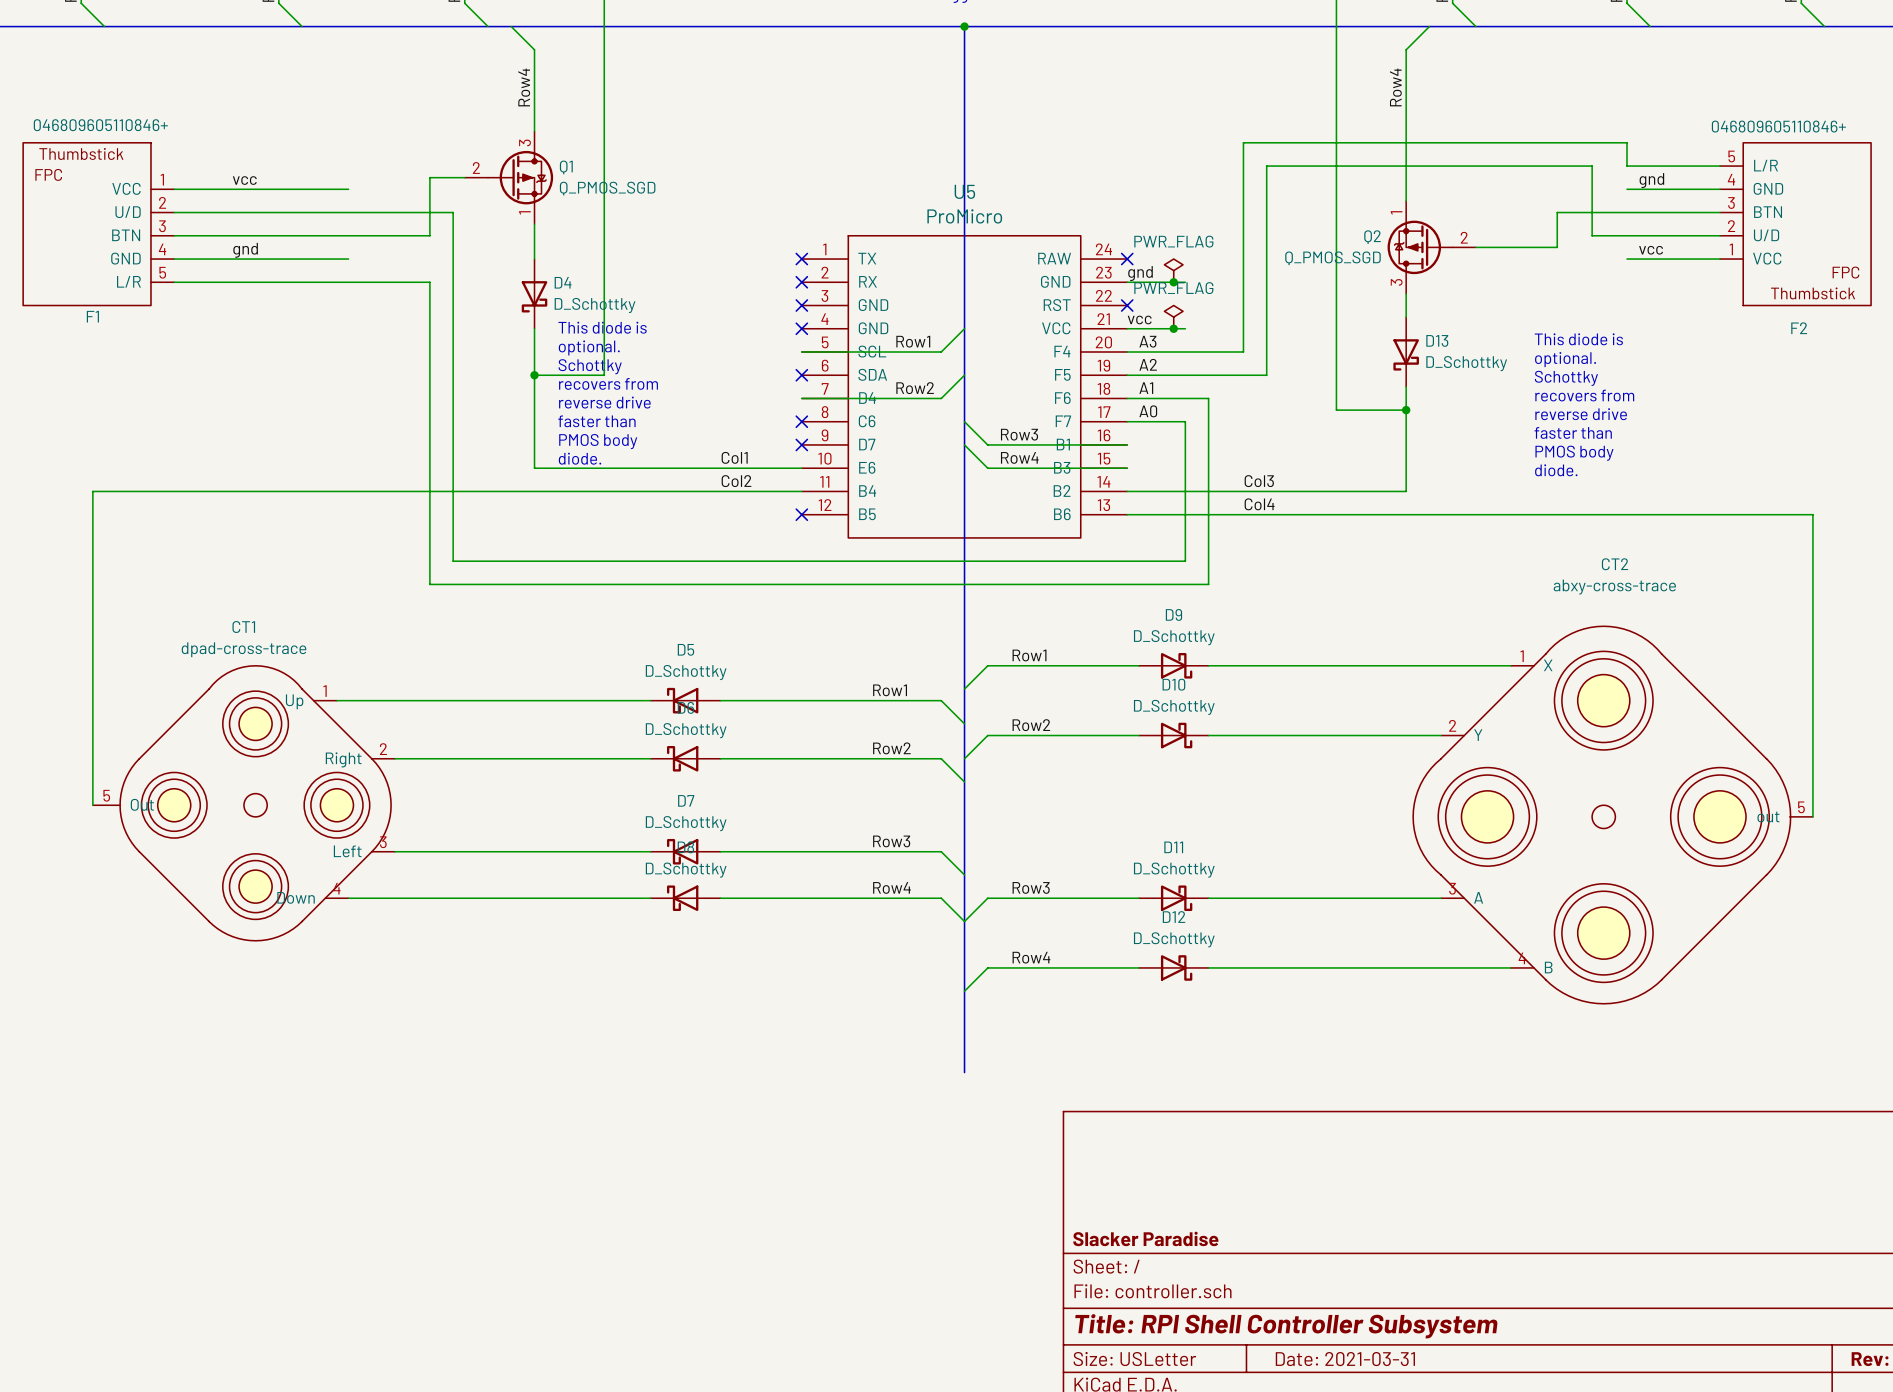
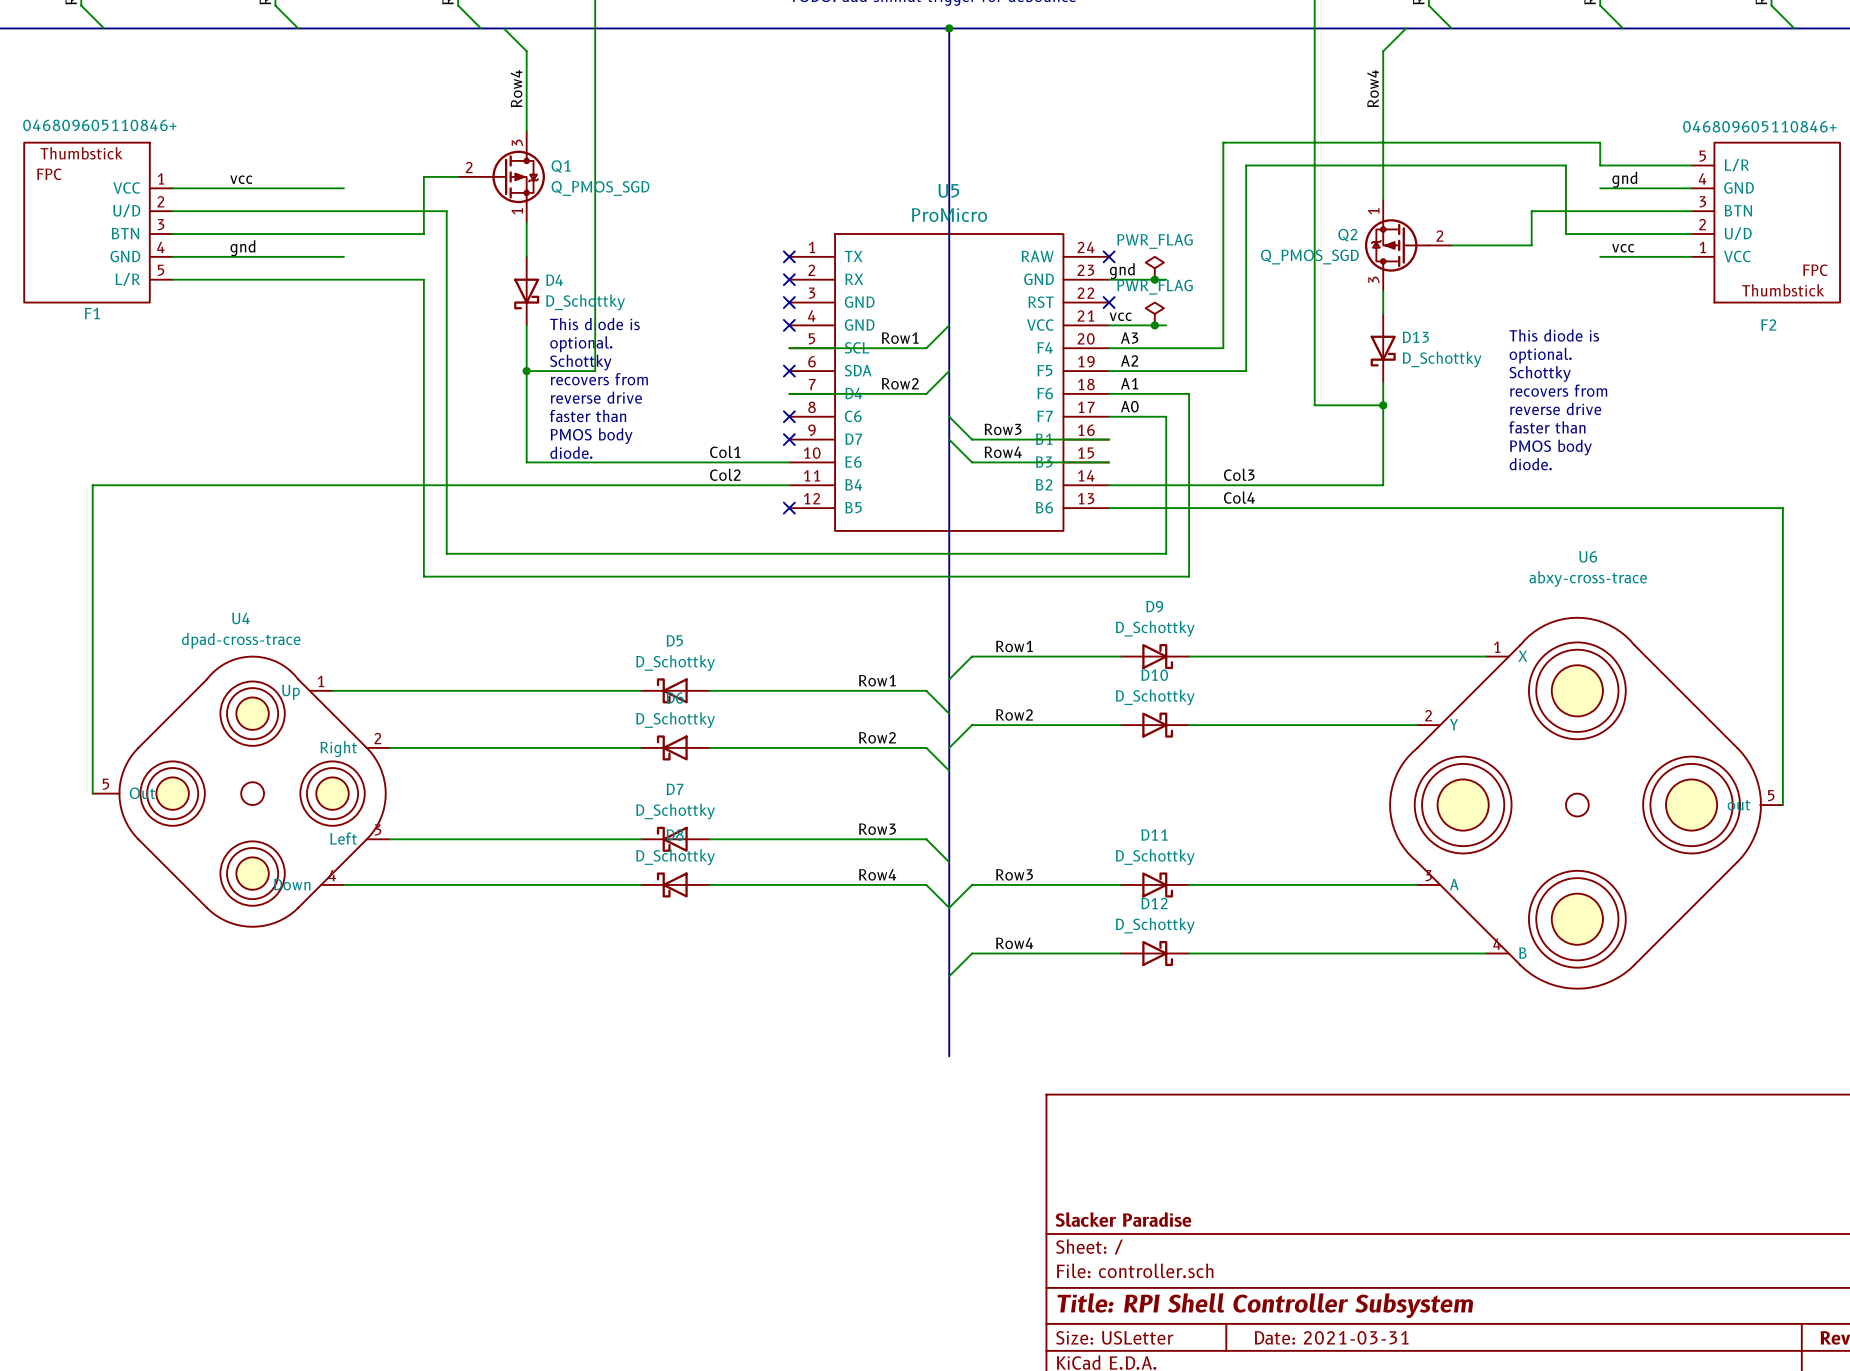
CT2 name: CT2 (1615, 564) -> U6 (1588, 556)
CT1 name: CT1 (243, 627) -> U4 (240, 618)

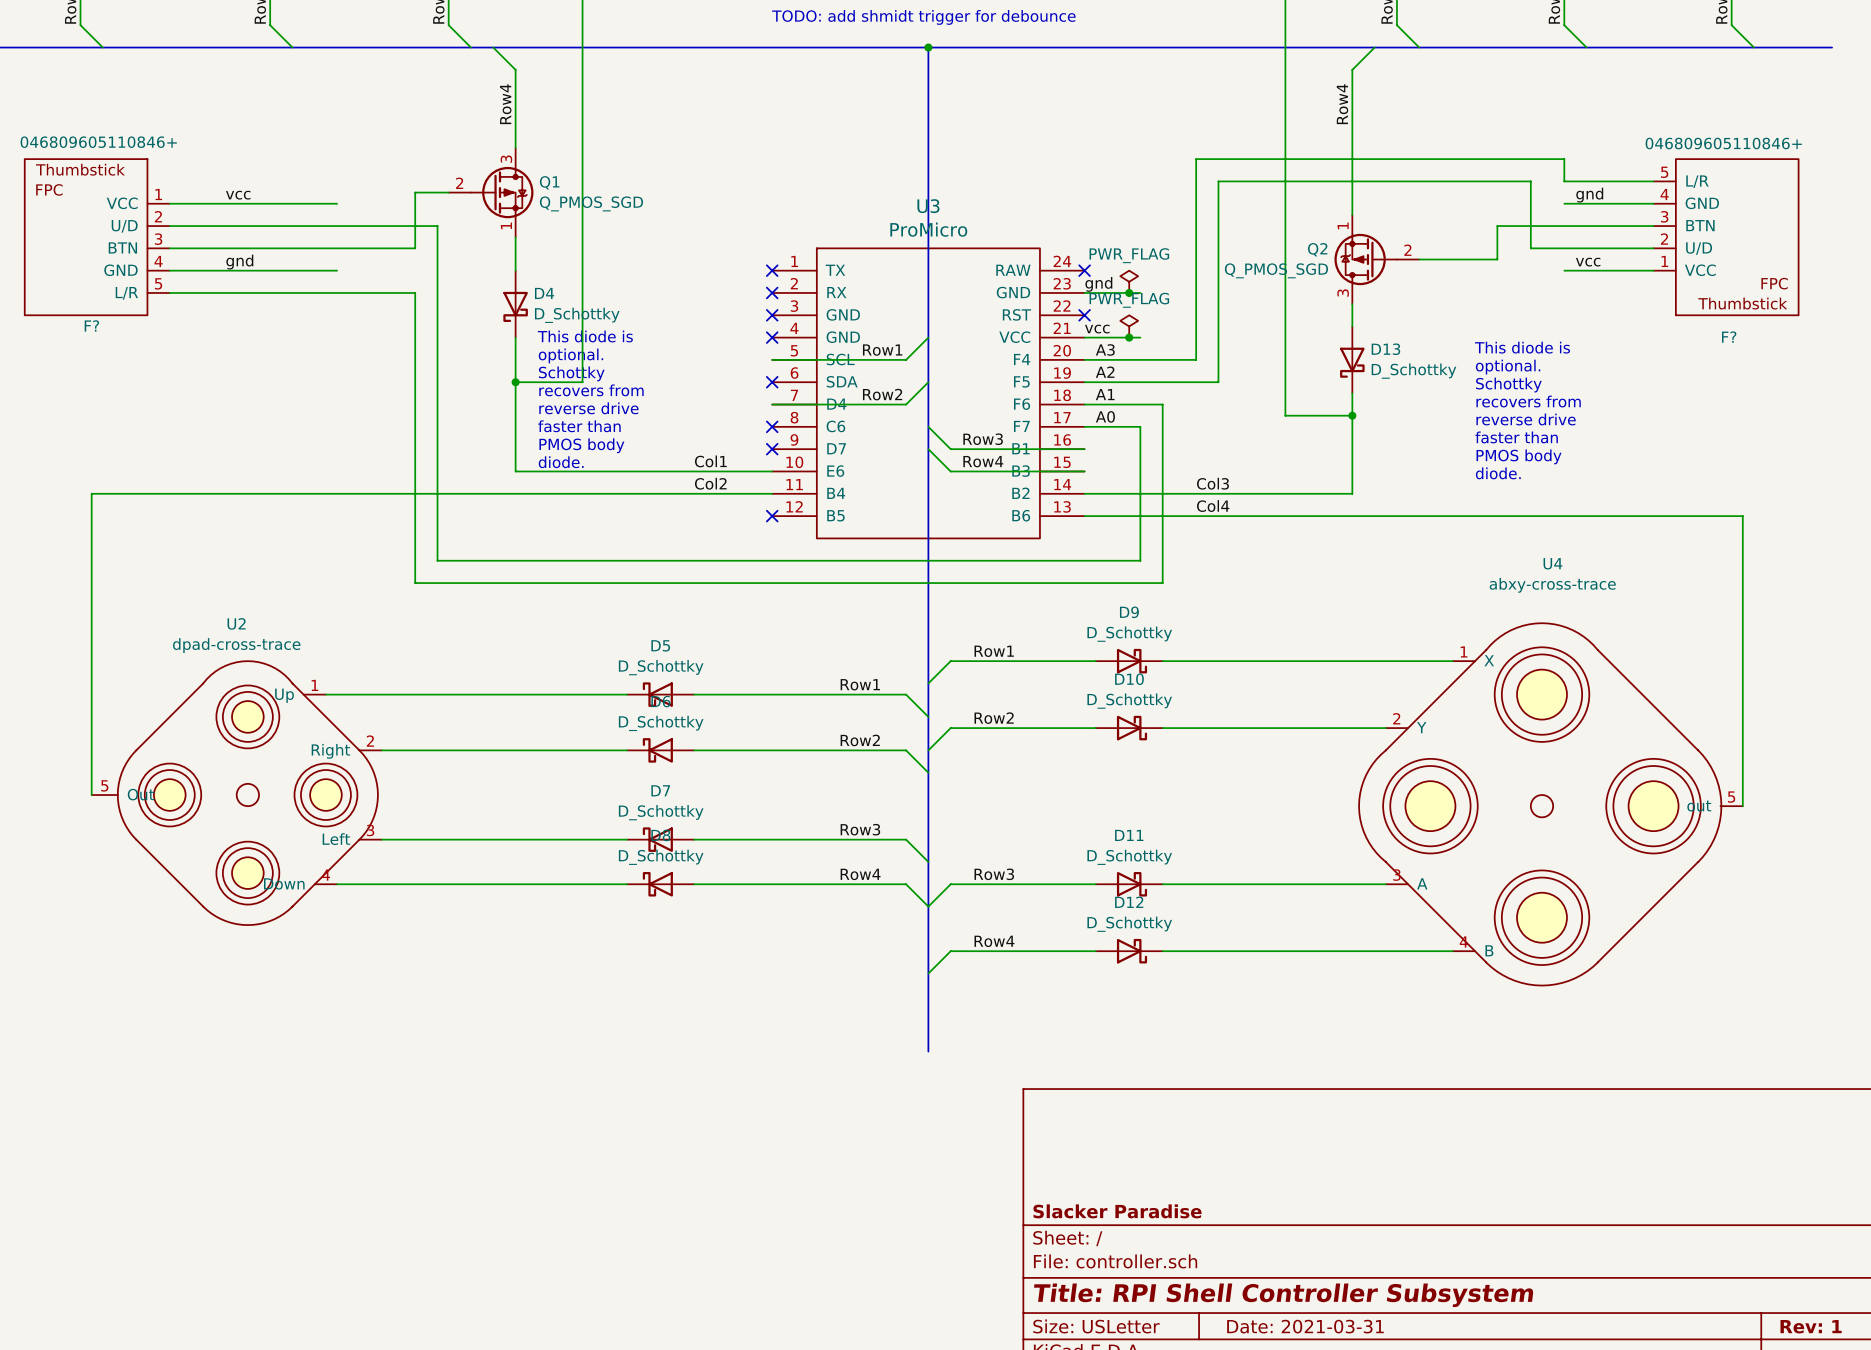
U5 name: U5 (948, 190) -> U3 (928, 206)
F1 name: F1 (92, 313) -> F? (91, 325)
F2 name: F2 (1768, 324) -> F? (1729, 337)
U6 name: U6 (1588, 556) -> U4 (1552, 563)
U4 name: U4 (240, 618) -> U2 (236, 623)

